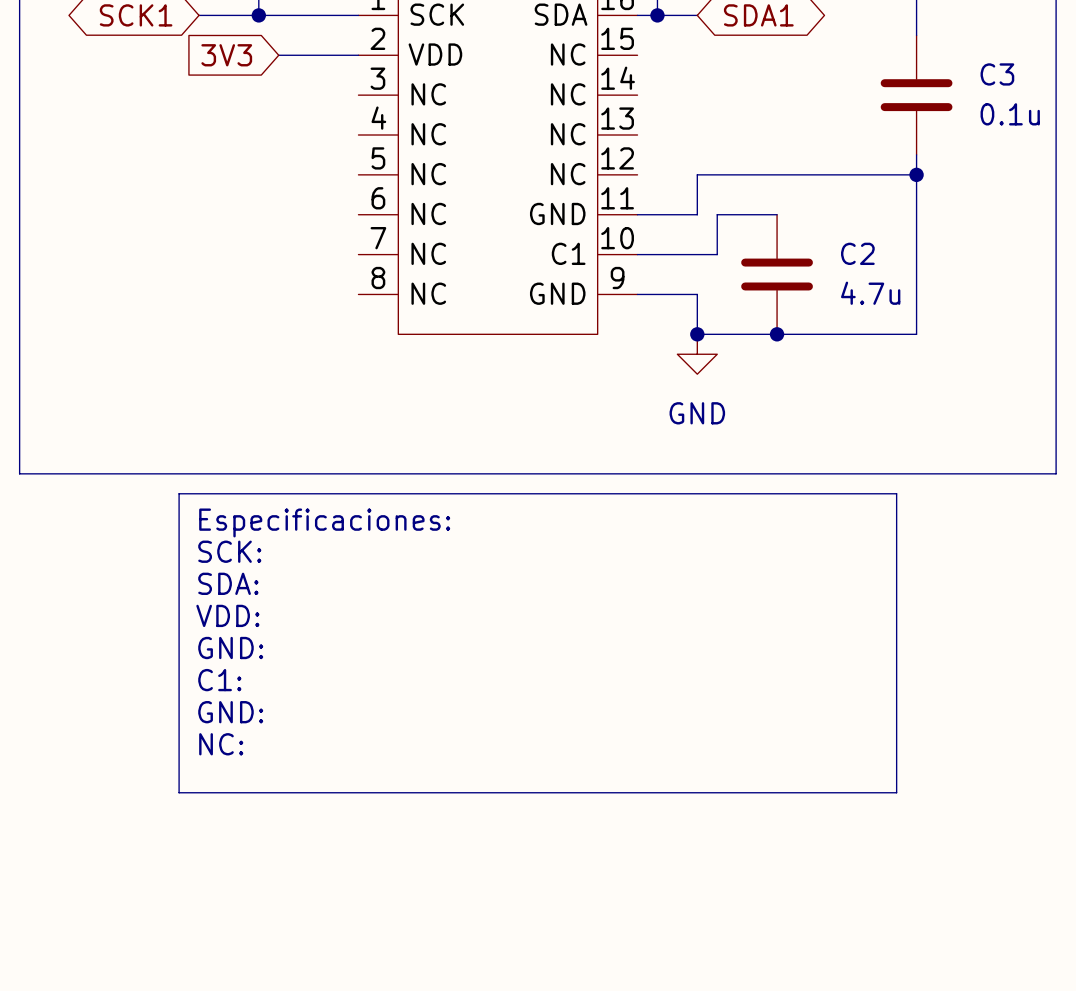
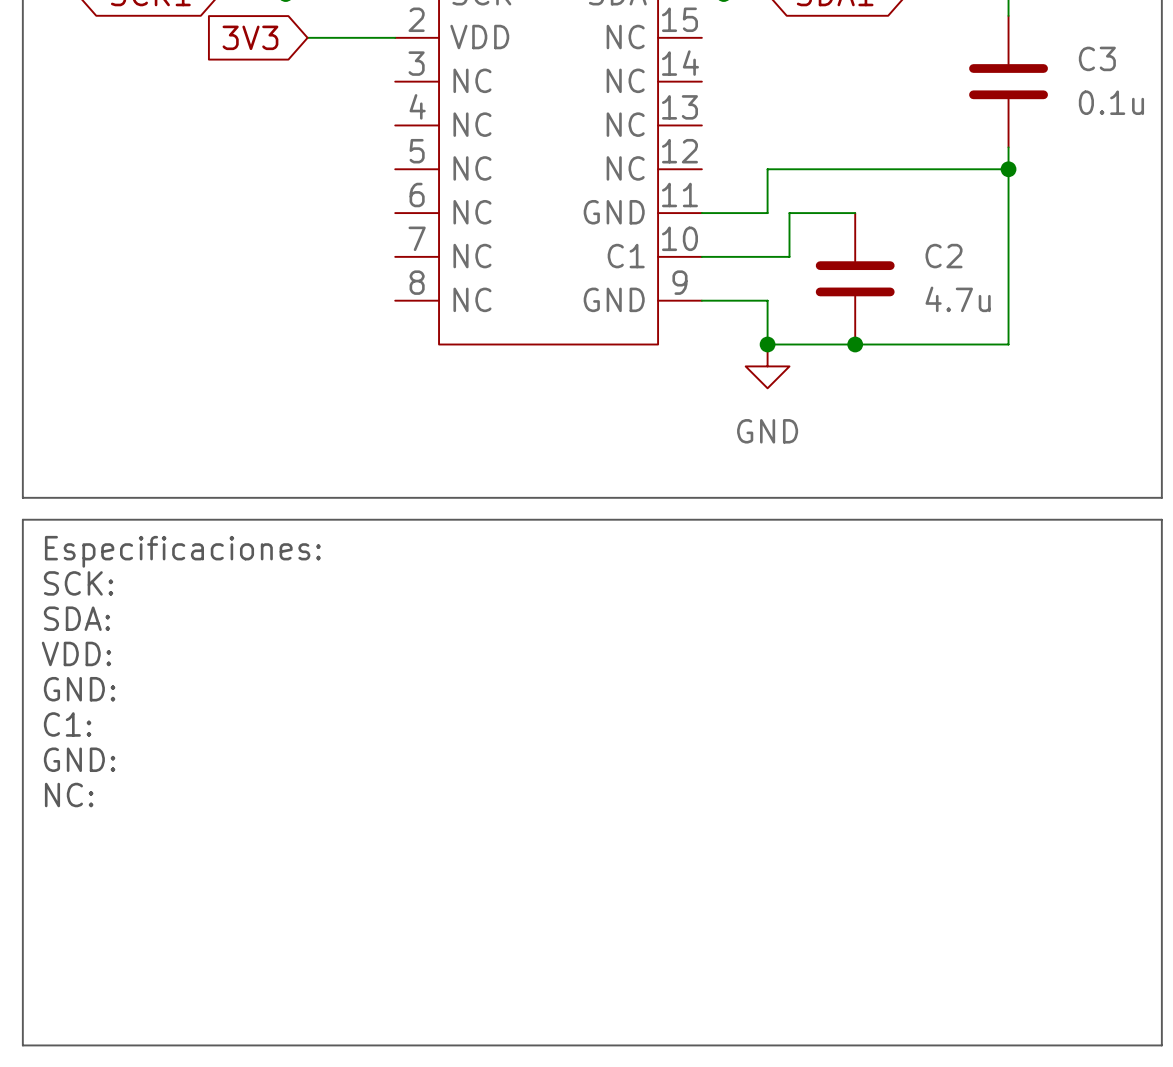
line: (179, 493) (179, 792) (896, 792) (896, 493) -> (198, 519) (22, 519) (22, 1045) (1161, 1045) (1161, 519) (986, 519)
text position: Especificaciones: (324, 522) -> Especificaciones: (182, 551)
text position: SCK: (229, 551) -> SCK: (78, 583)
text position: SDA: (228, 583) -> SDA: (76, 618)
text position: VDD: (227, 615) -> VDD: (76, 653)
text: none -> GND: (79, 689)
text: GND: (230, 648) -> none
text position: C1: (219, 680) -> C1: (67, 724)
text: none -> GND: (79, 759)
text: GND: (230, 712) -> none
text position: NC: (221, 744) -> NC: (69, 795)

